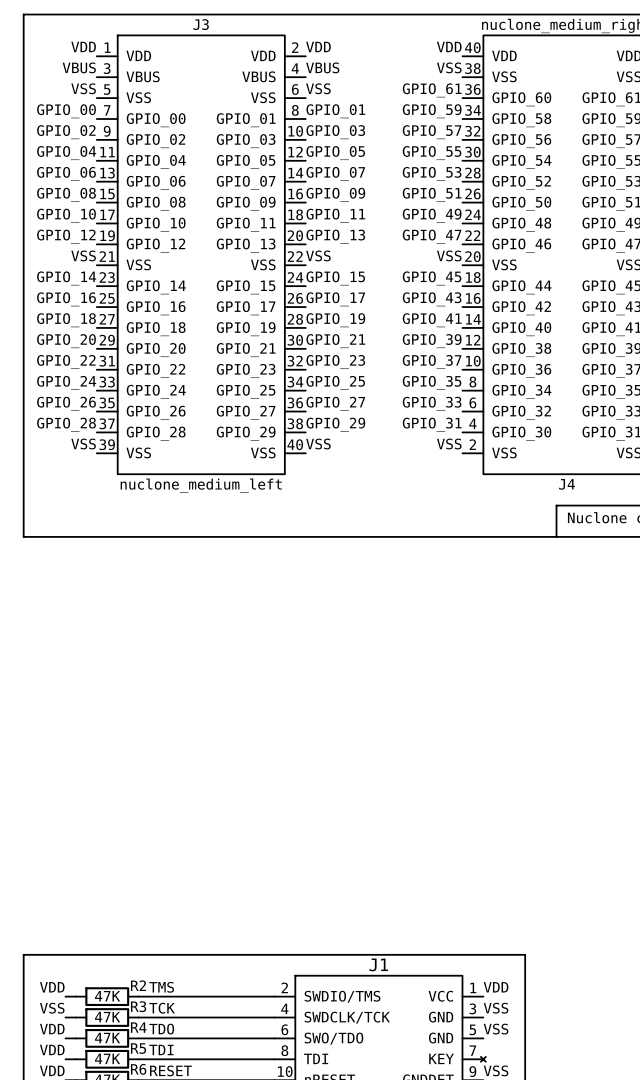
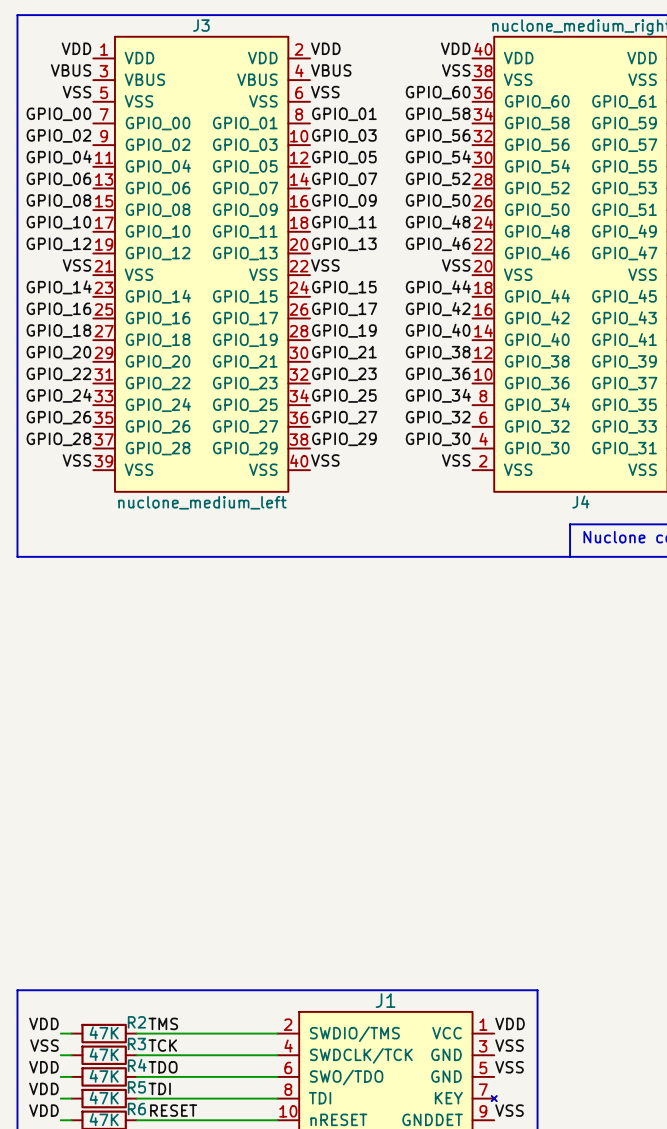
label: GPIO_61 (432, 90) -> GPIO_60 (438, 92)
label: GPIO_59 (432, 111) -> GPIO_58 (438, 114)
label: GPIO_57 (432, 132) -> GPIO_56 (438, 135)
label: GPIO_55 (432, 153) -> GPIO_54 (438, 157)
label: GPIO_53 (432, 173) -> GPIO_52 (438, 179)
label: GPIO_51 (432, 194) -> GPIO_50 (438, 200)
label: GPIO_49 (432, 215) -> GPIO_48 (438, 222)
label: GPIO_47 (432, 236) -> GPIO_46 (438, 244)
label: GPIO_45 (432, 278) -> GPIO_44 (438, 287)
label: GPIO_43 (432, 299) -> GPIO_42 (438, 309)
label: GPIO_41 (432, 320) -> GPIO_40 (438, 330)
label: GPIO_39 (432, 341) -> GPIO_38 (438, 352)
label: GPIO_37 (432, 362) -> GPIO_36 (438, 374)
label: GPIO_35 (432, 382) -> GPIO_34 (438, 395)
label: GPIO_33 (432, 403) -> GPIO_32 (438, 417)
label: GPIO_31 (432, 424) -> GPIO_30 (438, 439)

